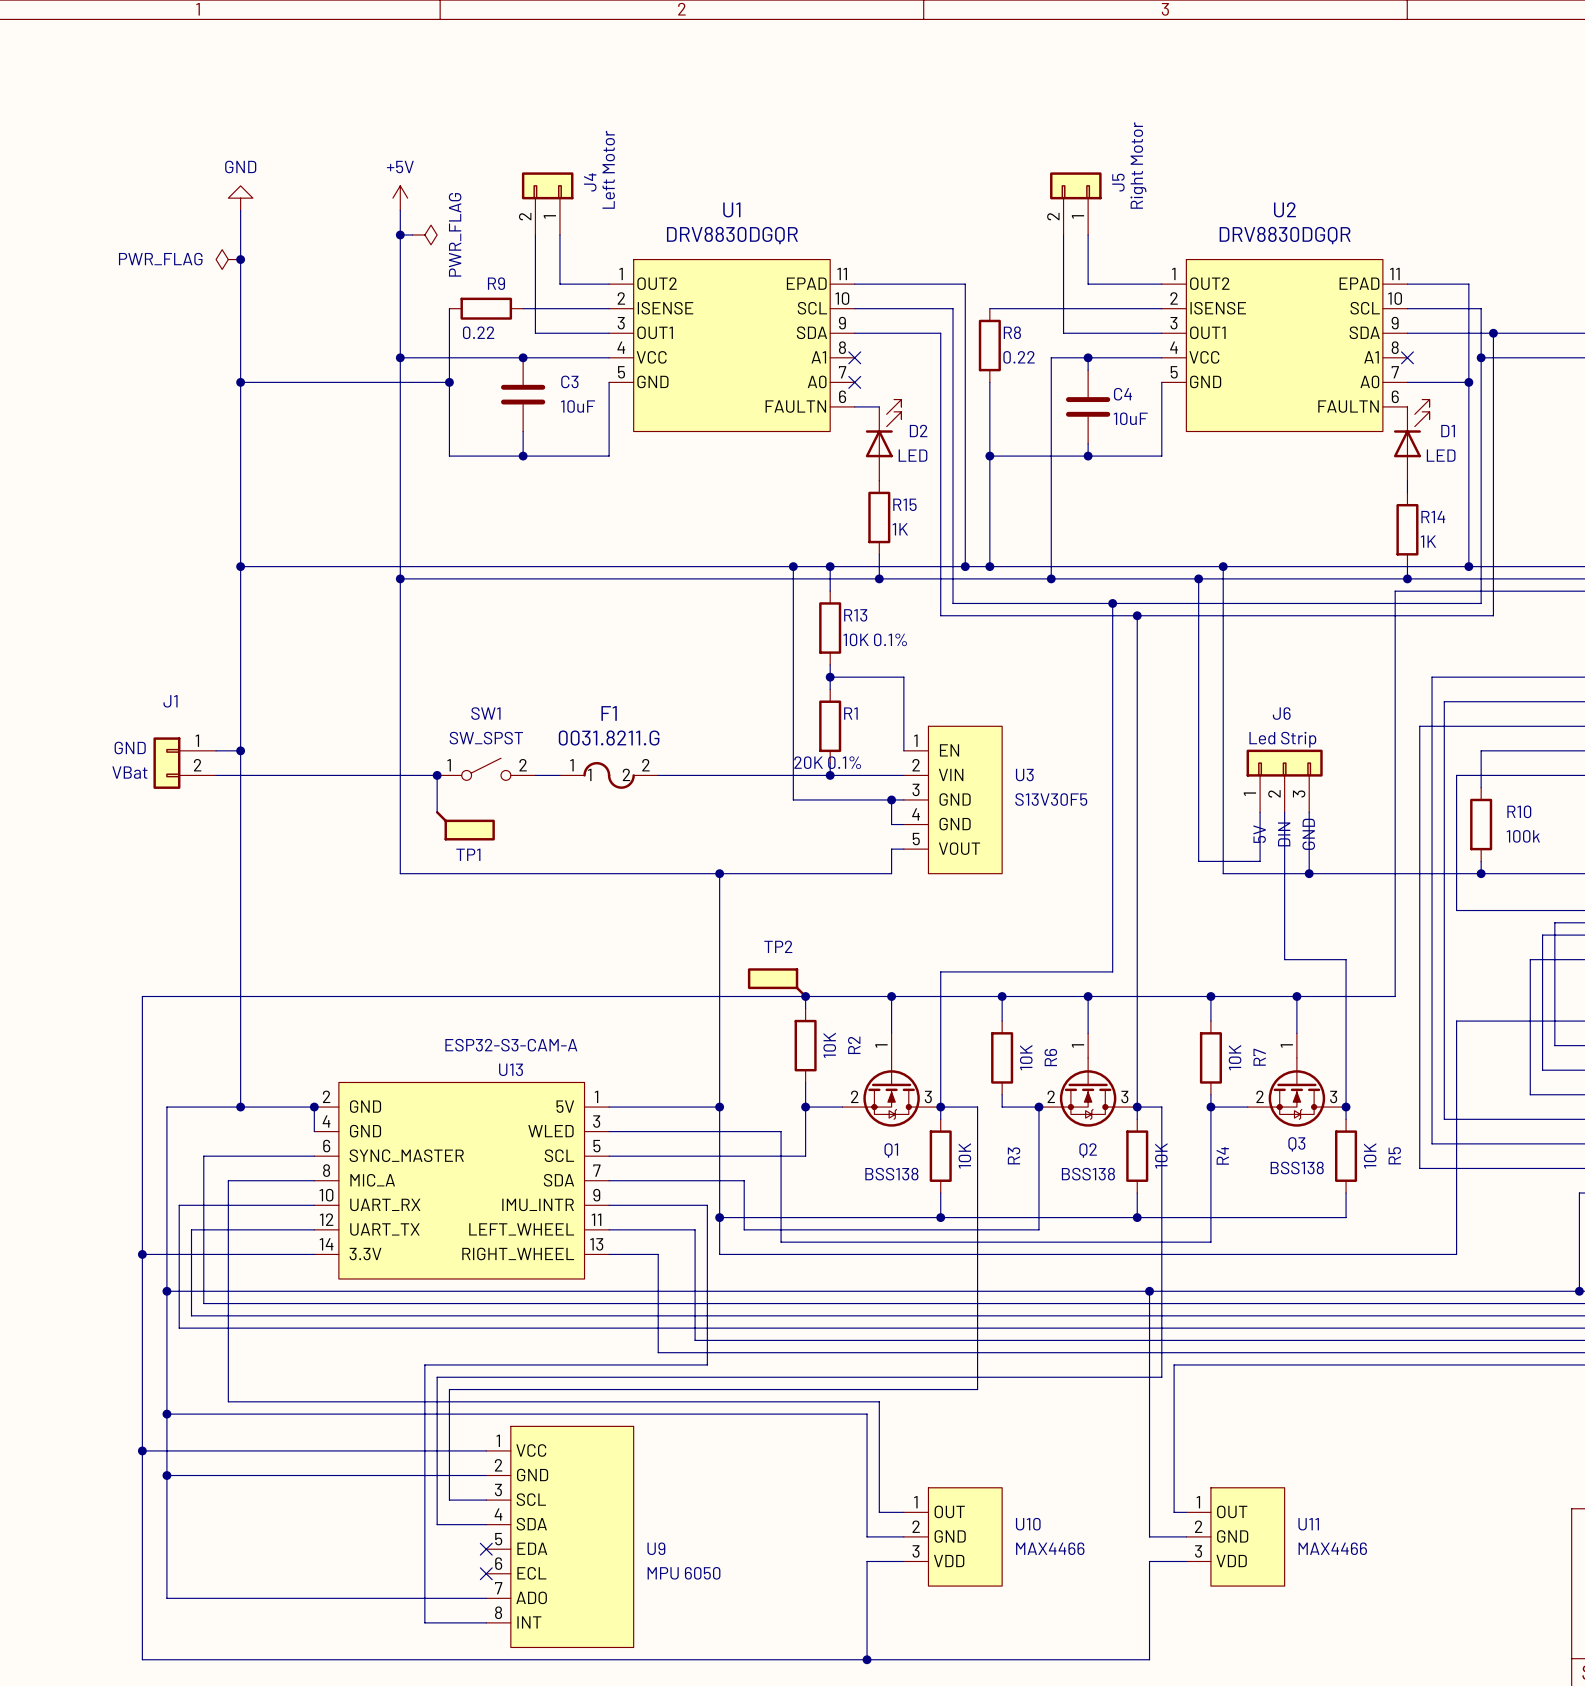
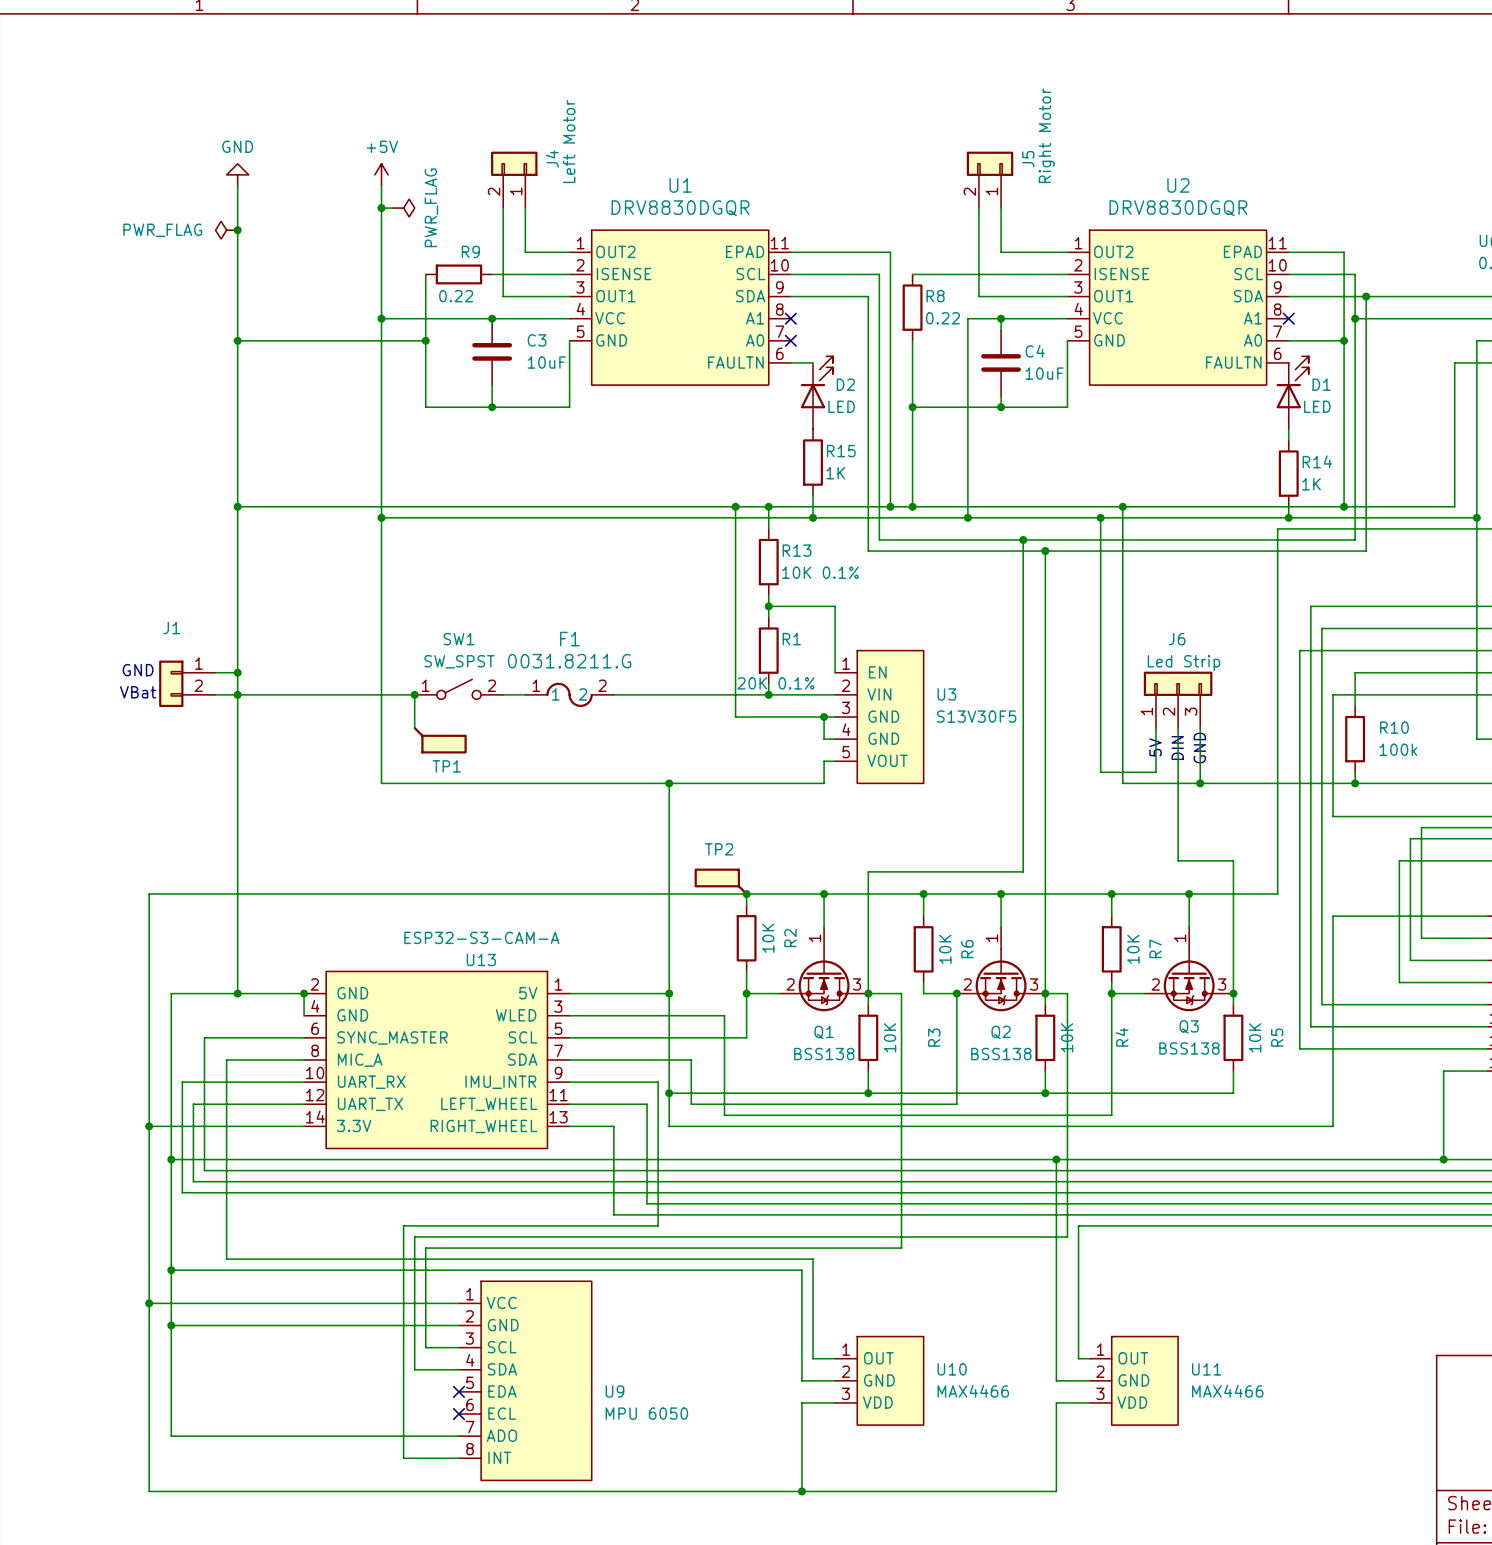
junction: none -> (237, 694)

